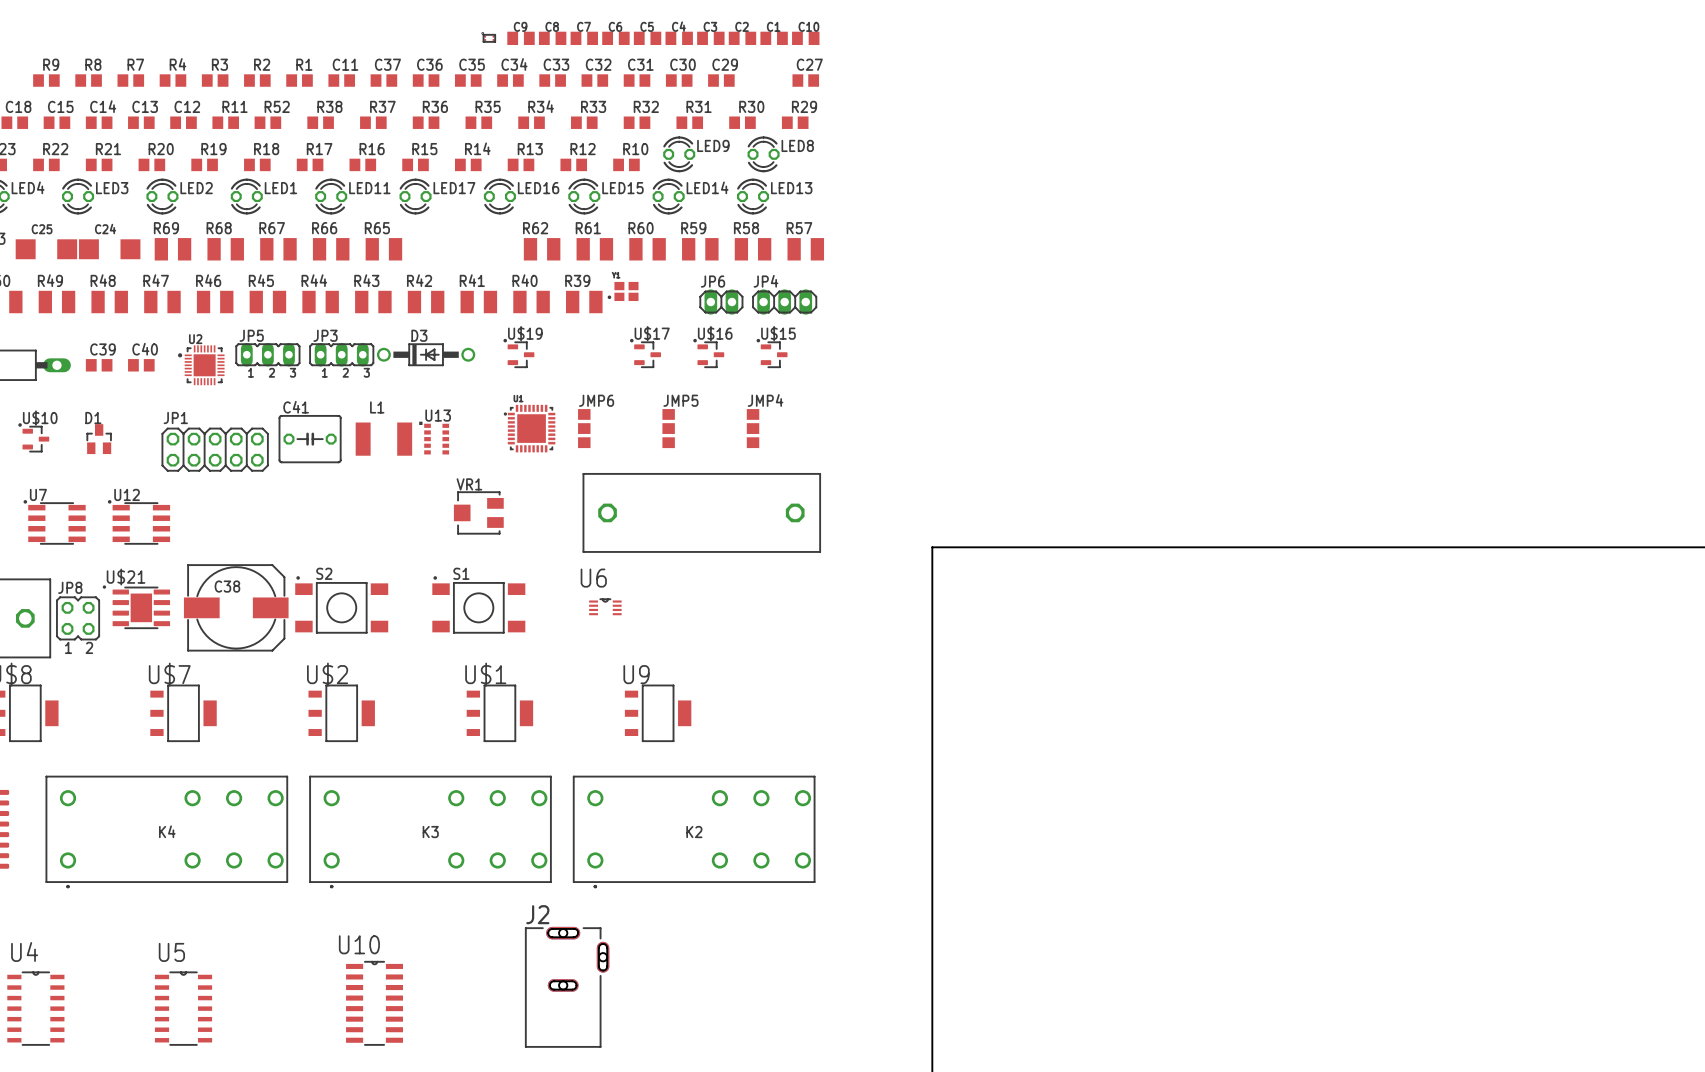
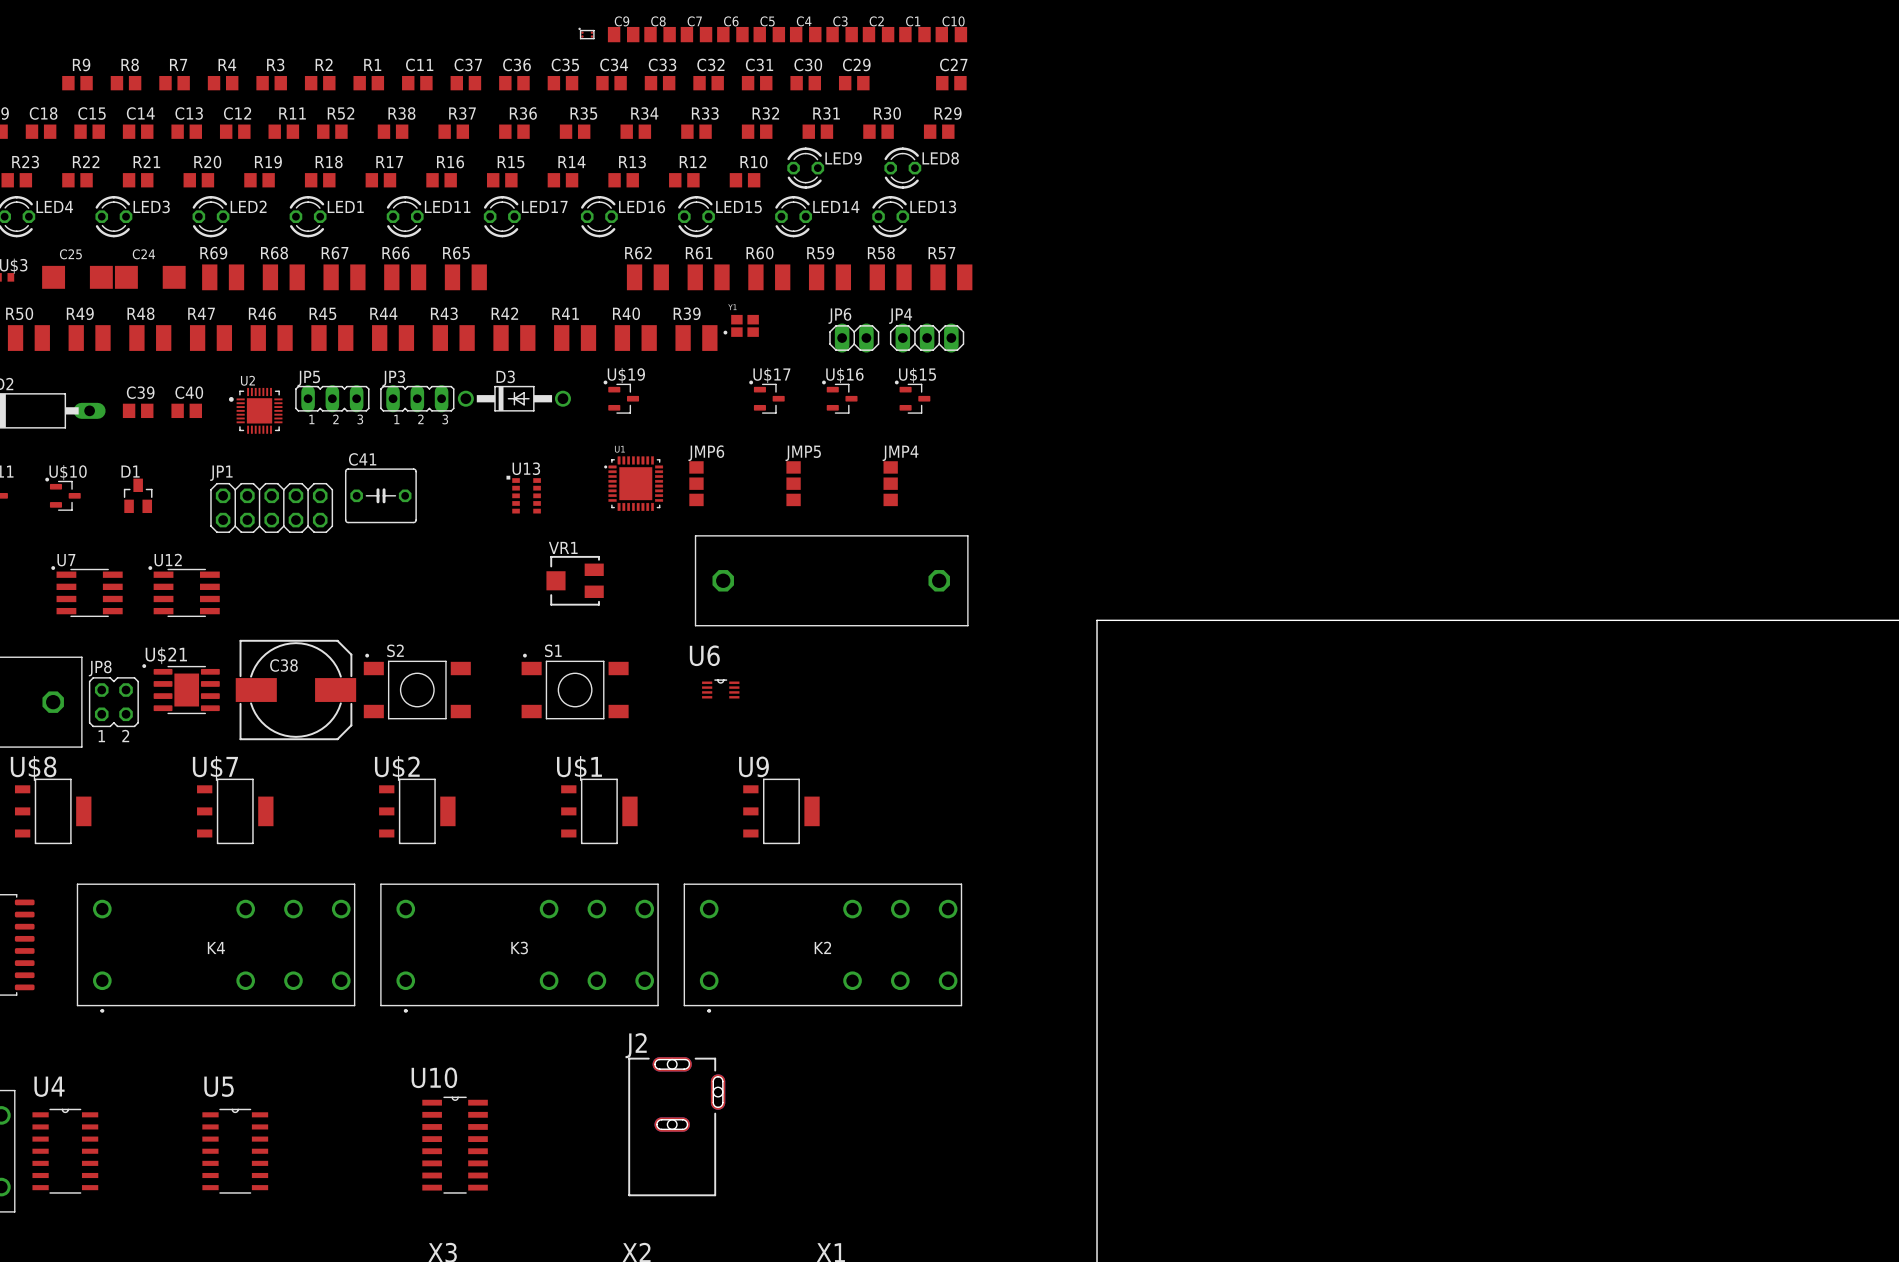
L1: (383, 439) -> none

